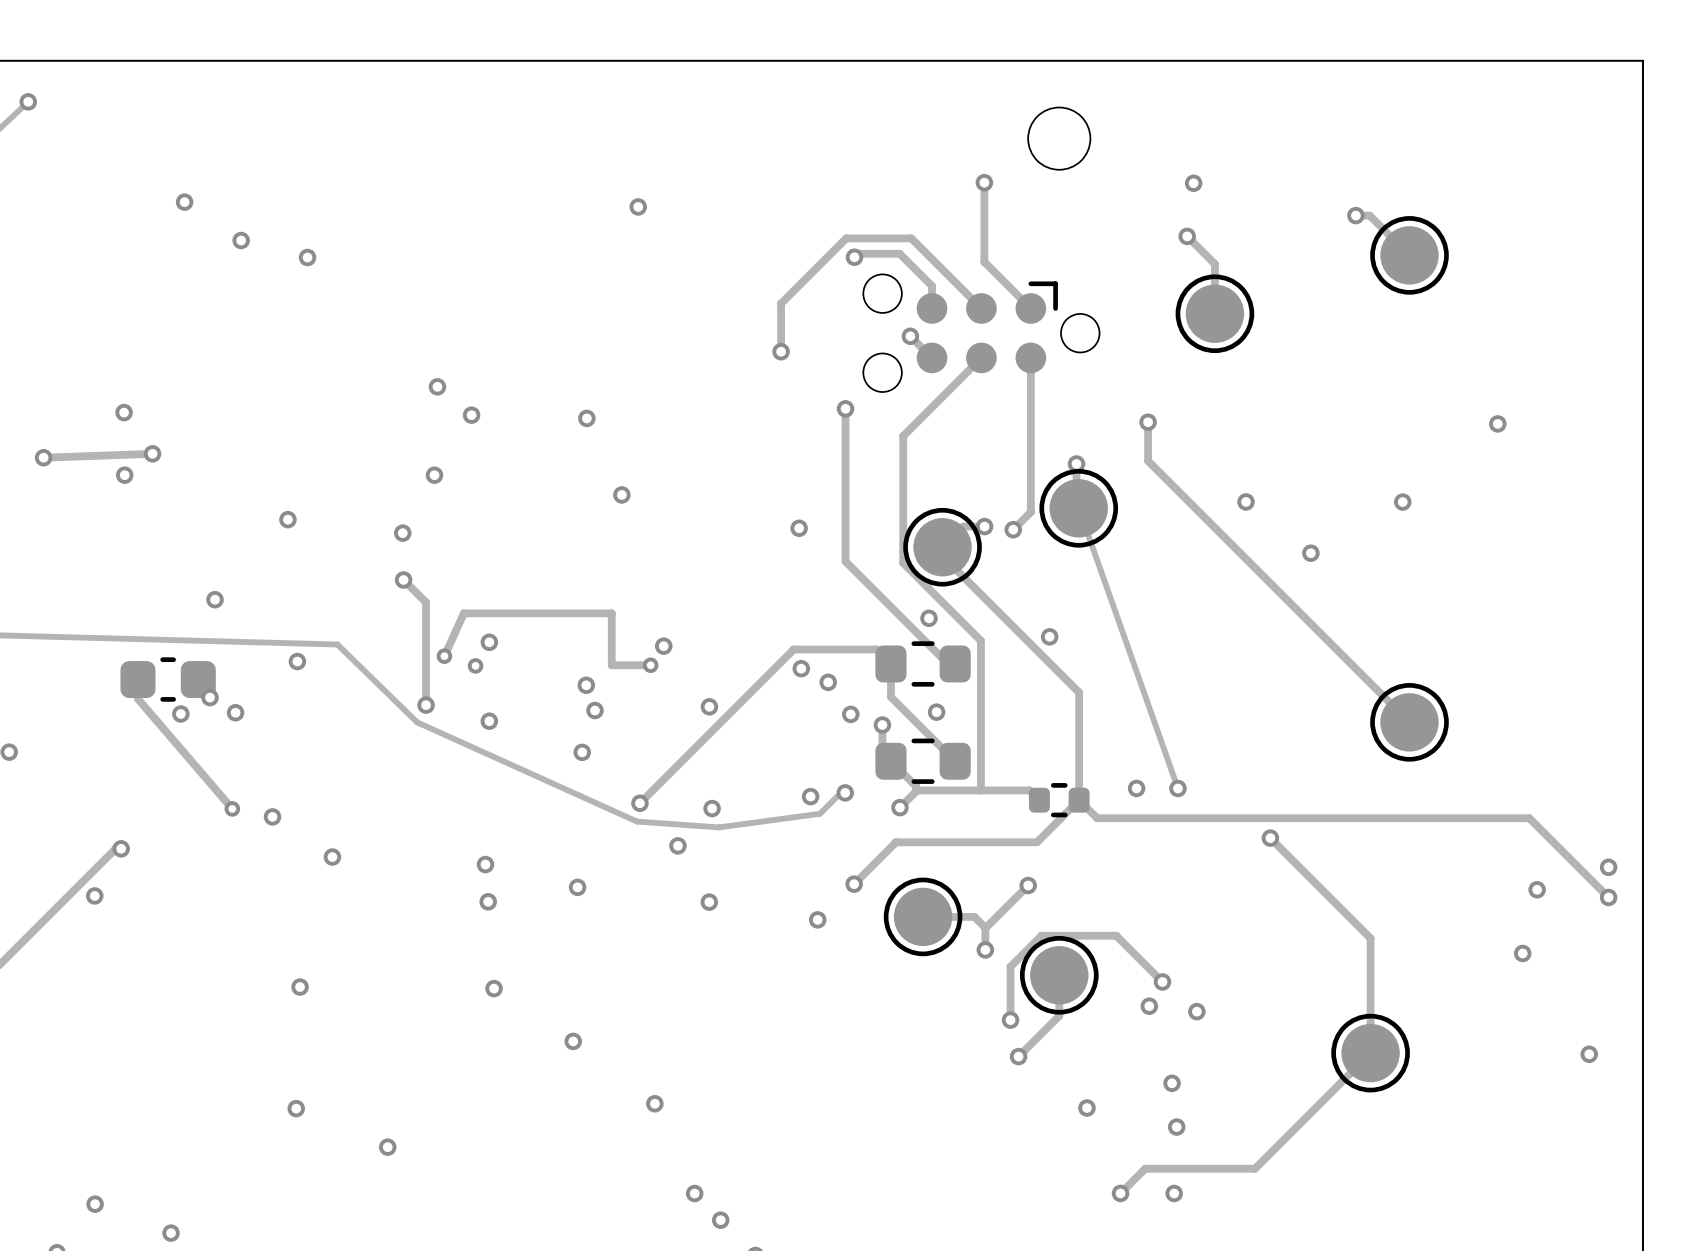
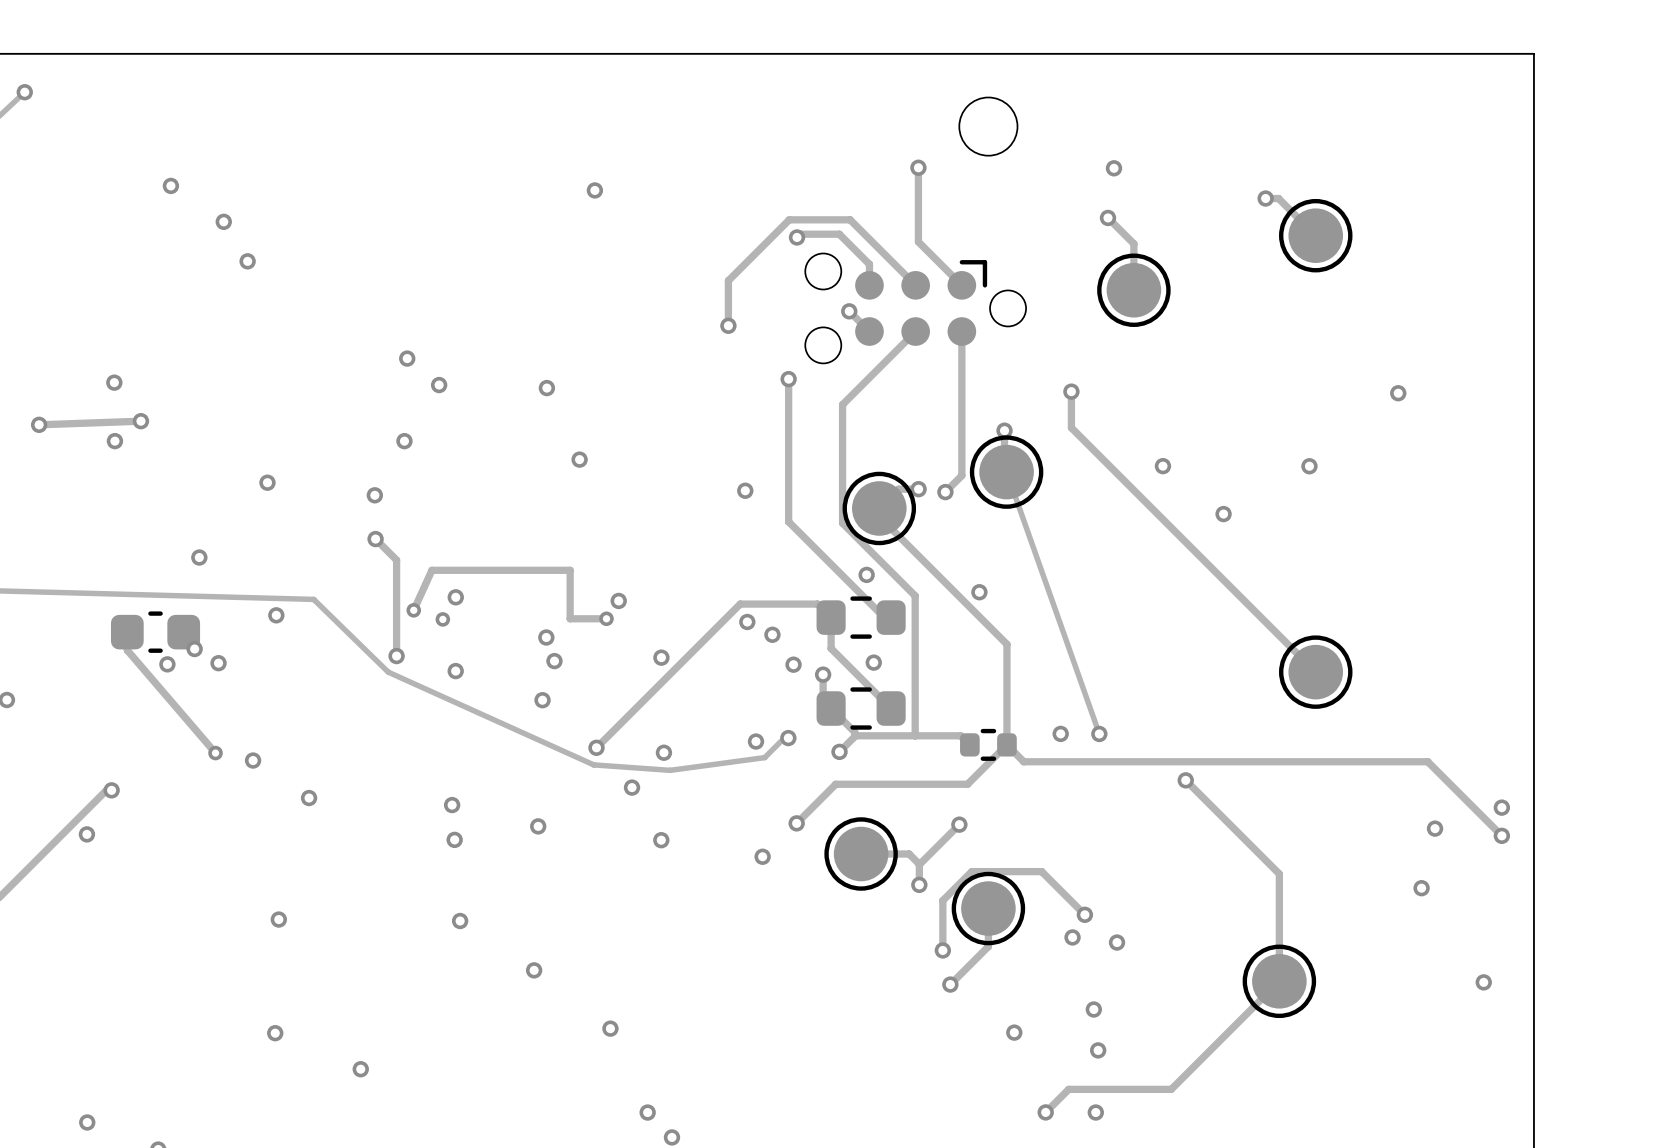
via position: (307, 257) -> (247, 261)

